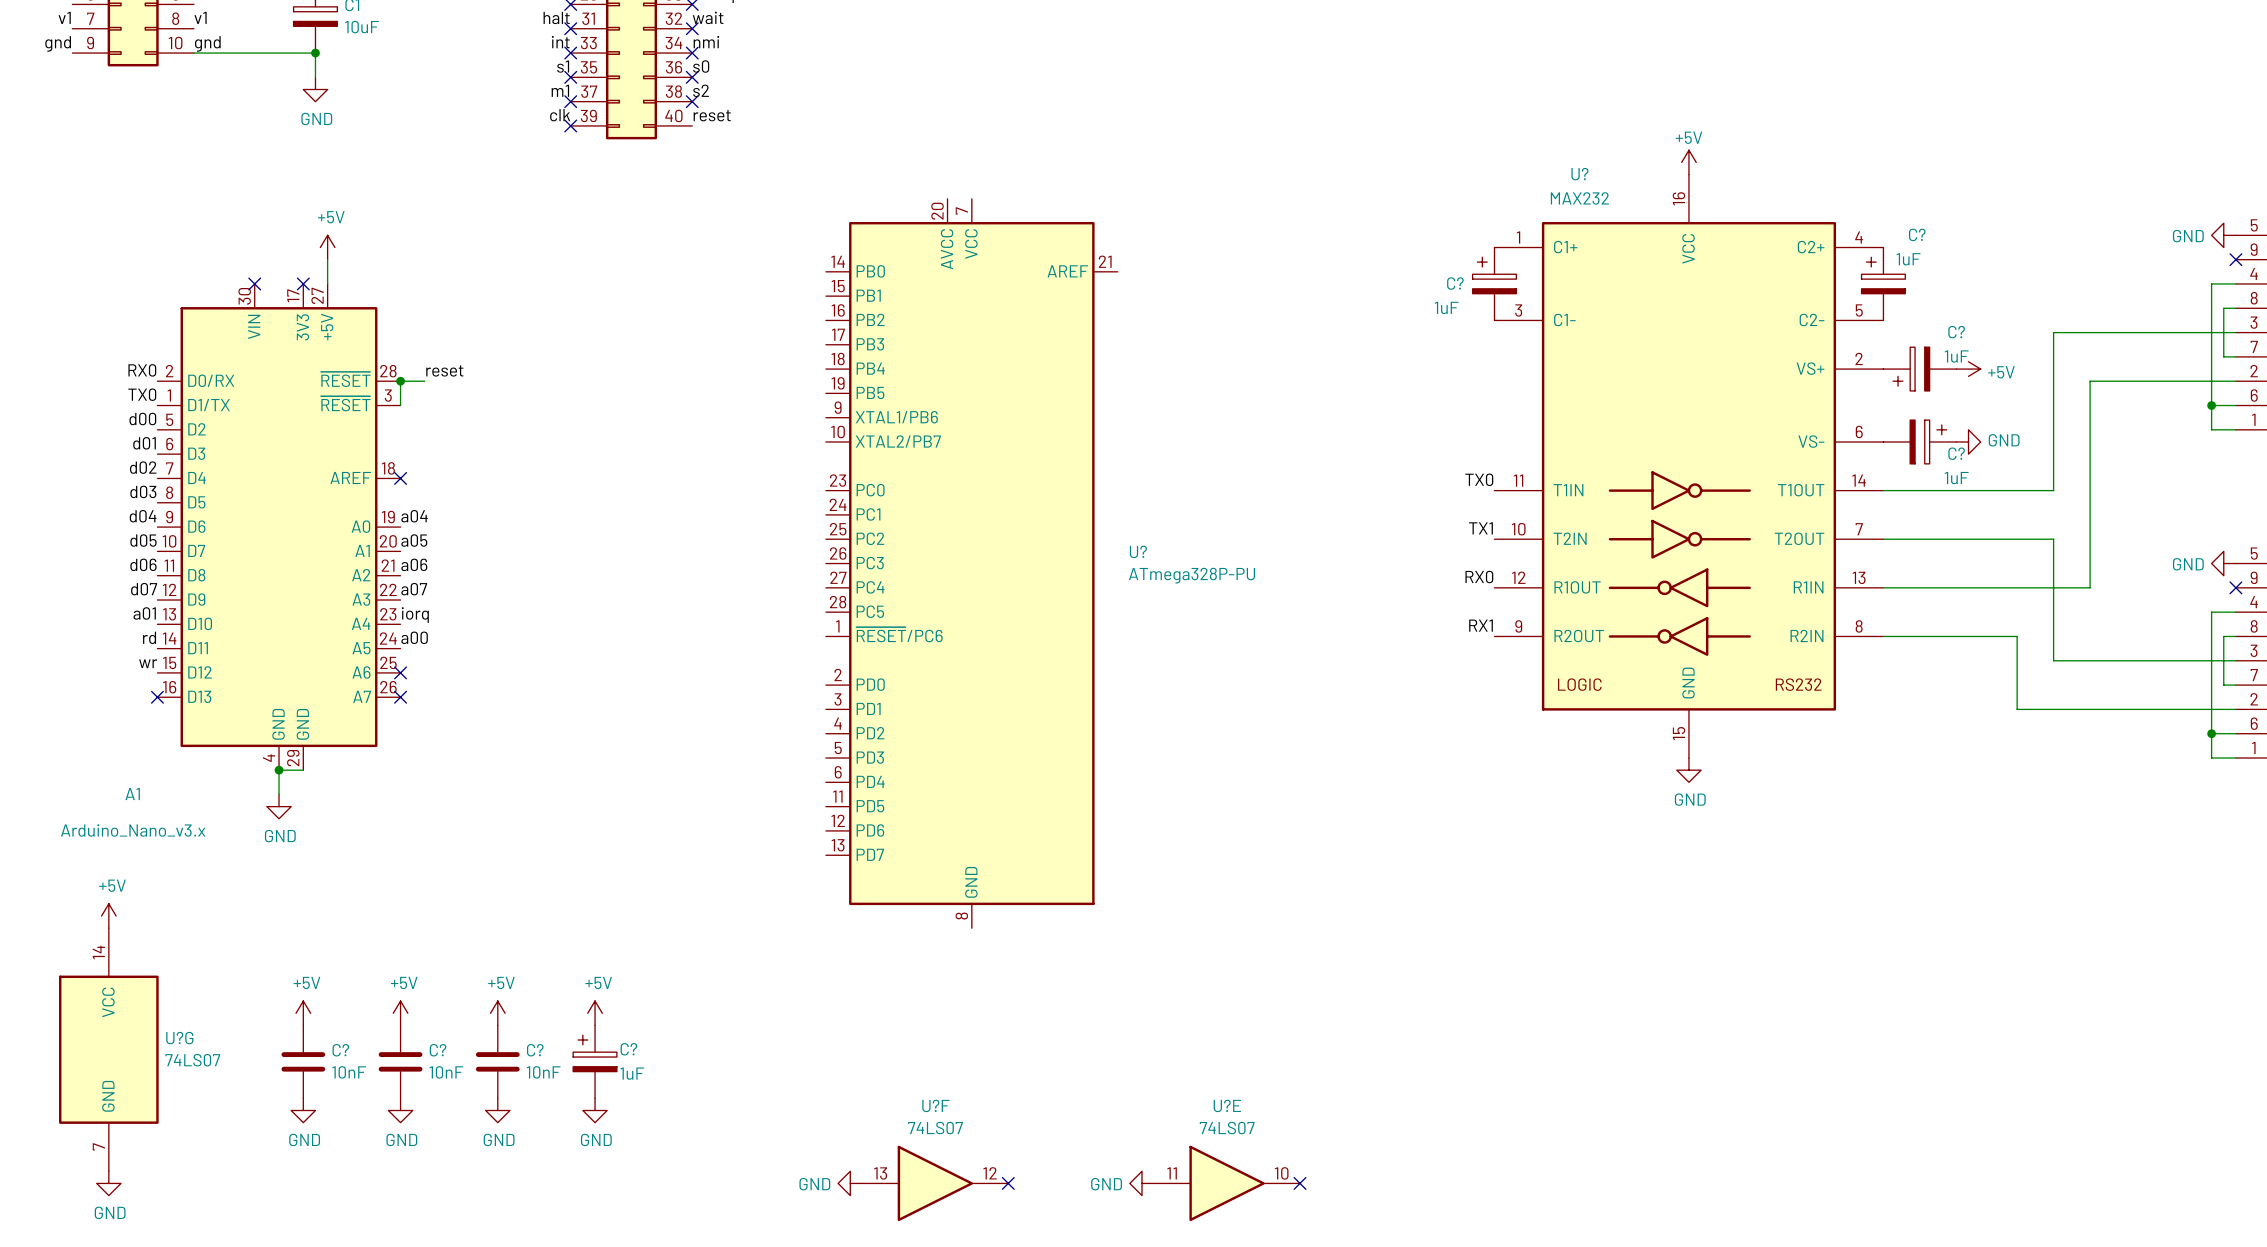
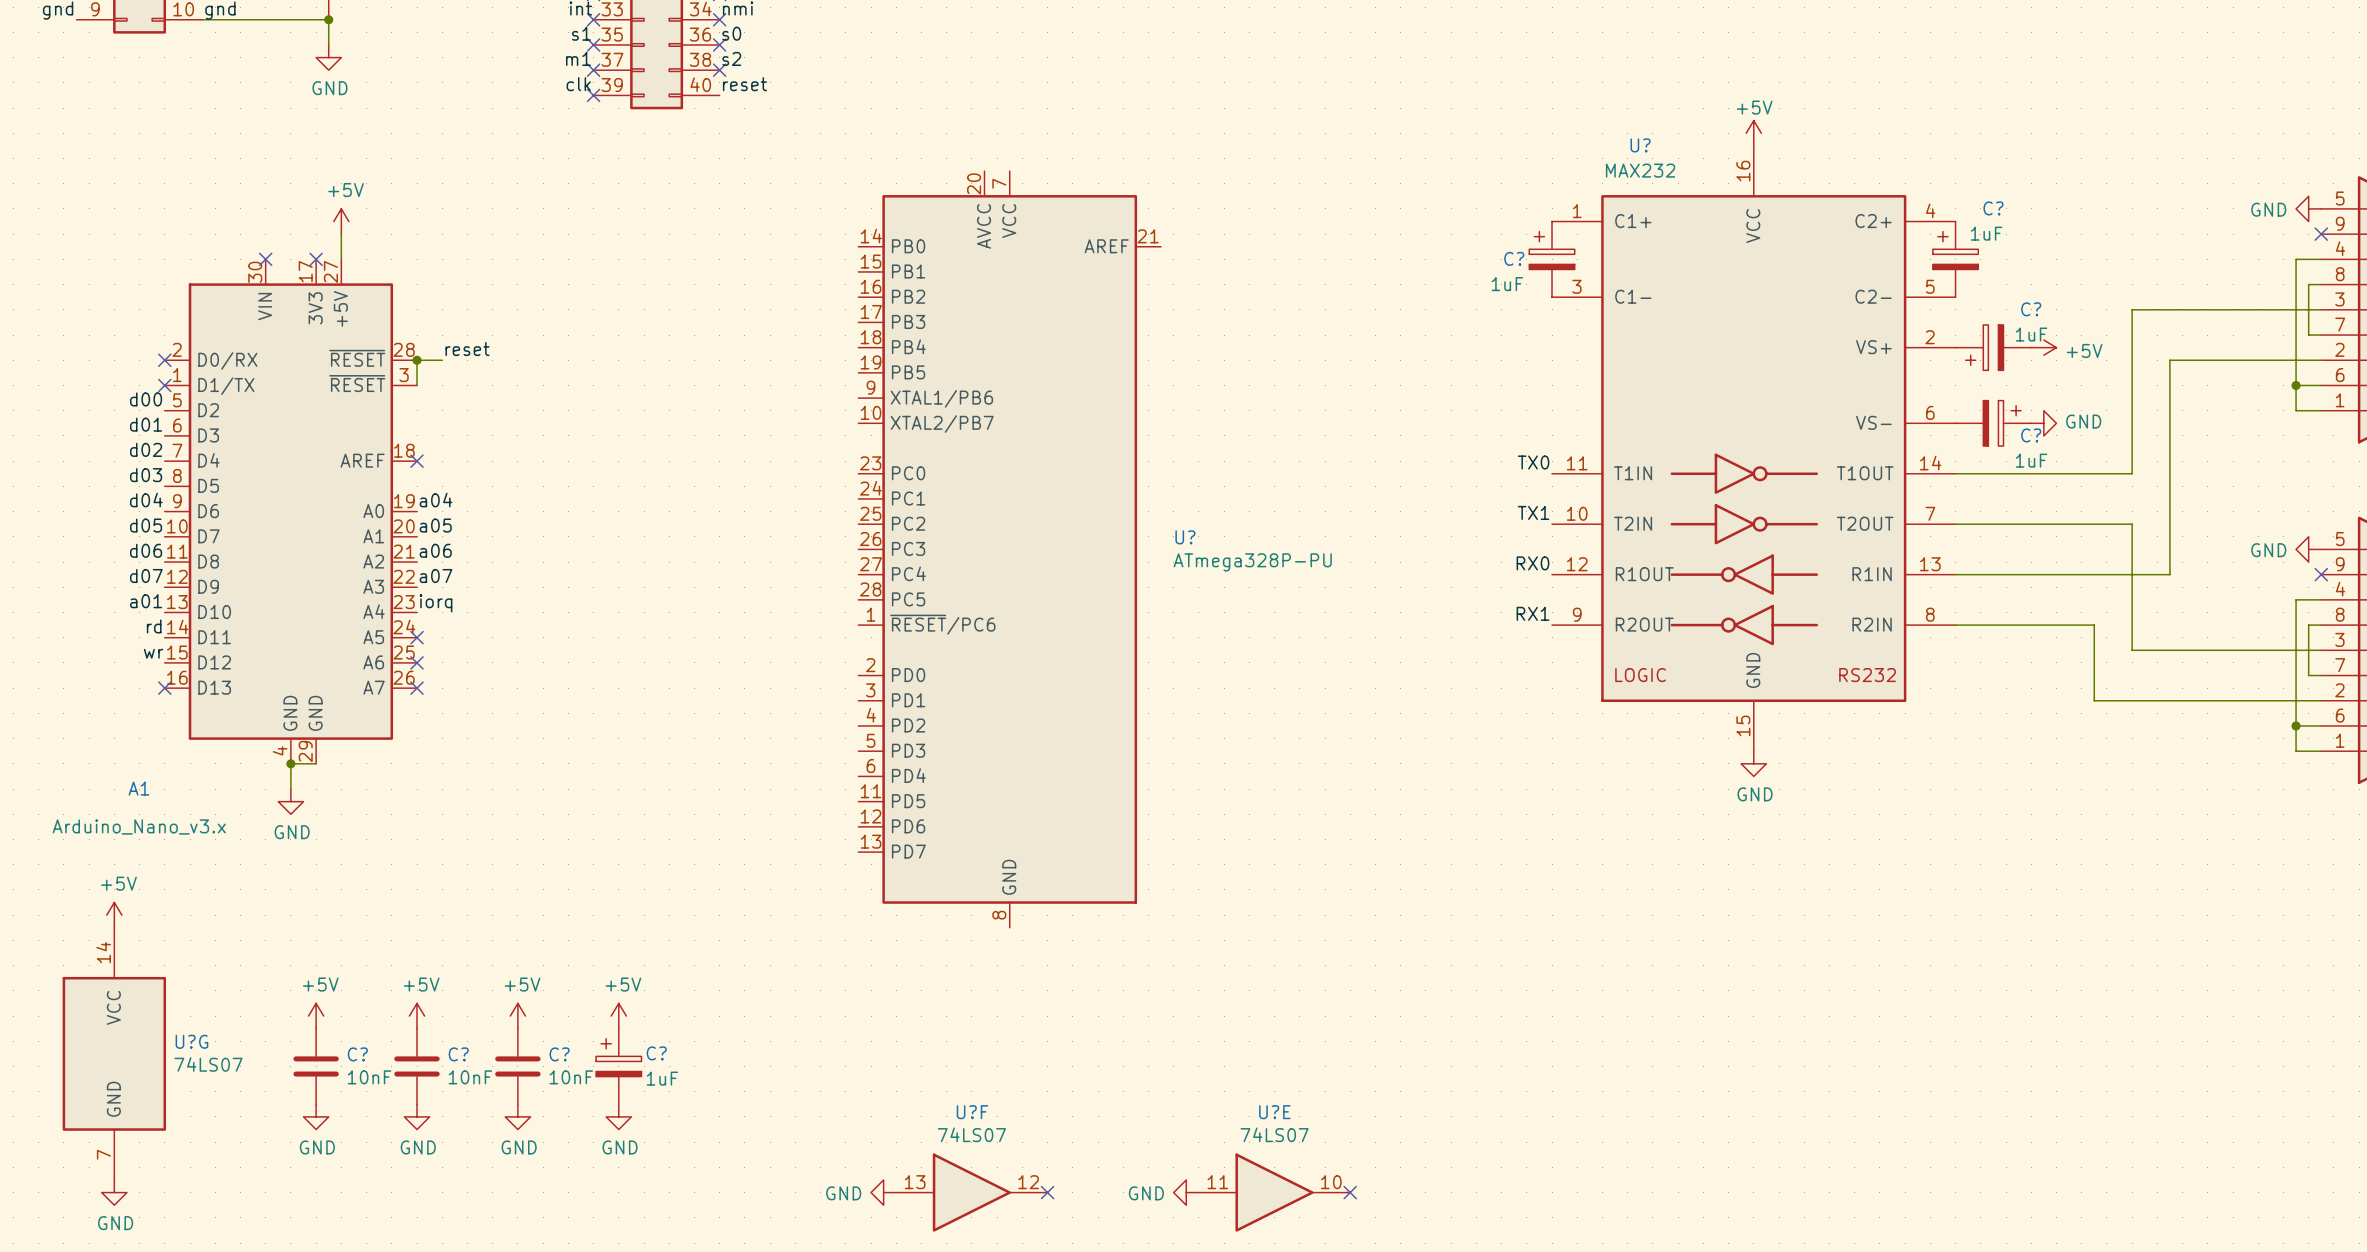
label: RX0 (142, 370) -> none
no-connect mark: none -> (164, 360)
label: TX0 (142, 394) -> none
no-connect mark: none -> (164, 385)
label: a00 (414, 637) -> none
no-connect mark: none -> (417, 637)

